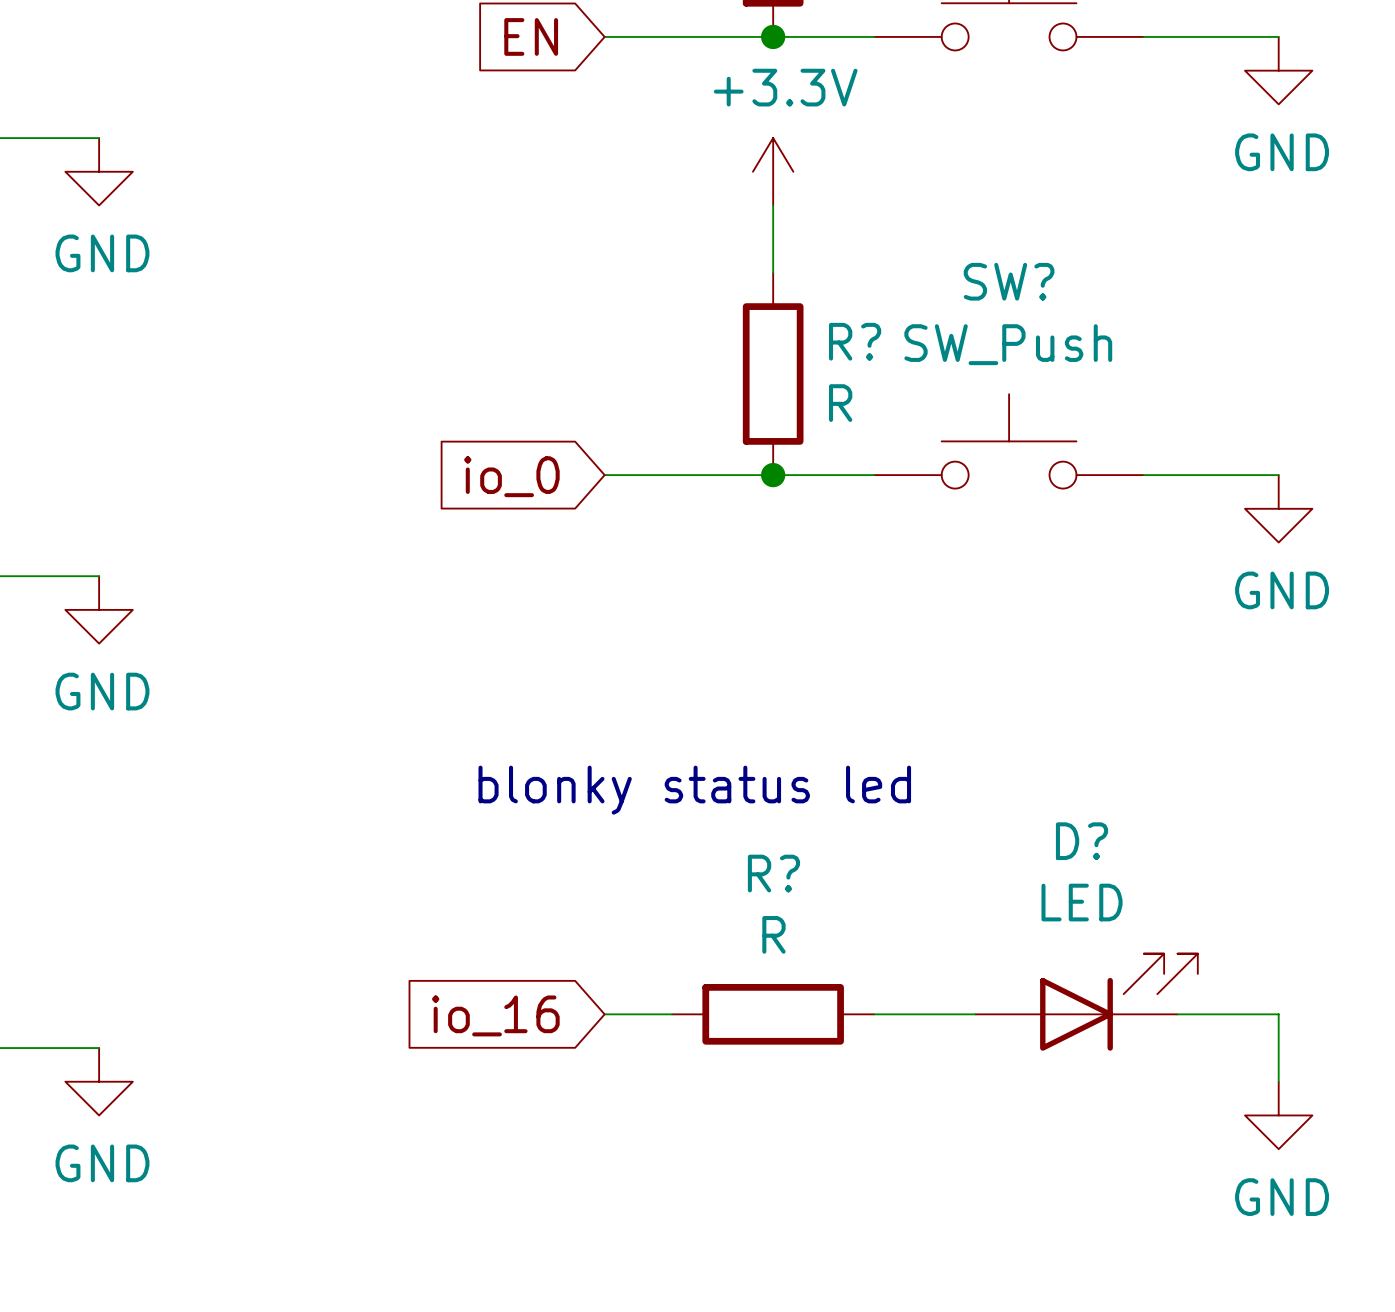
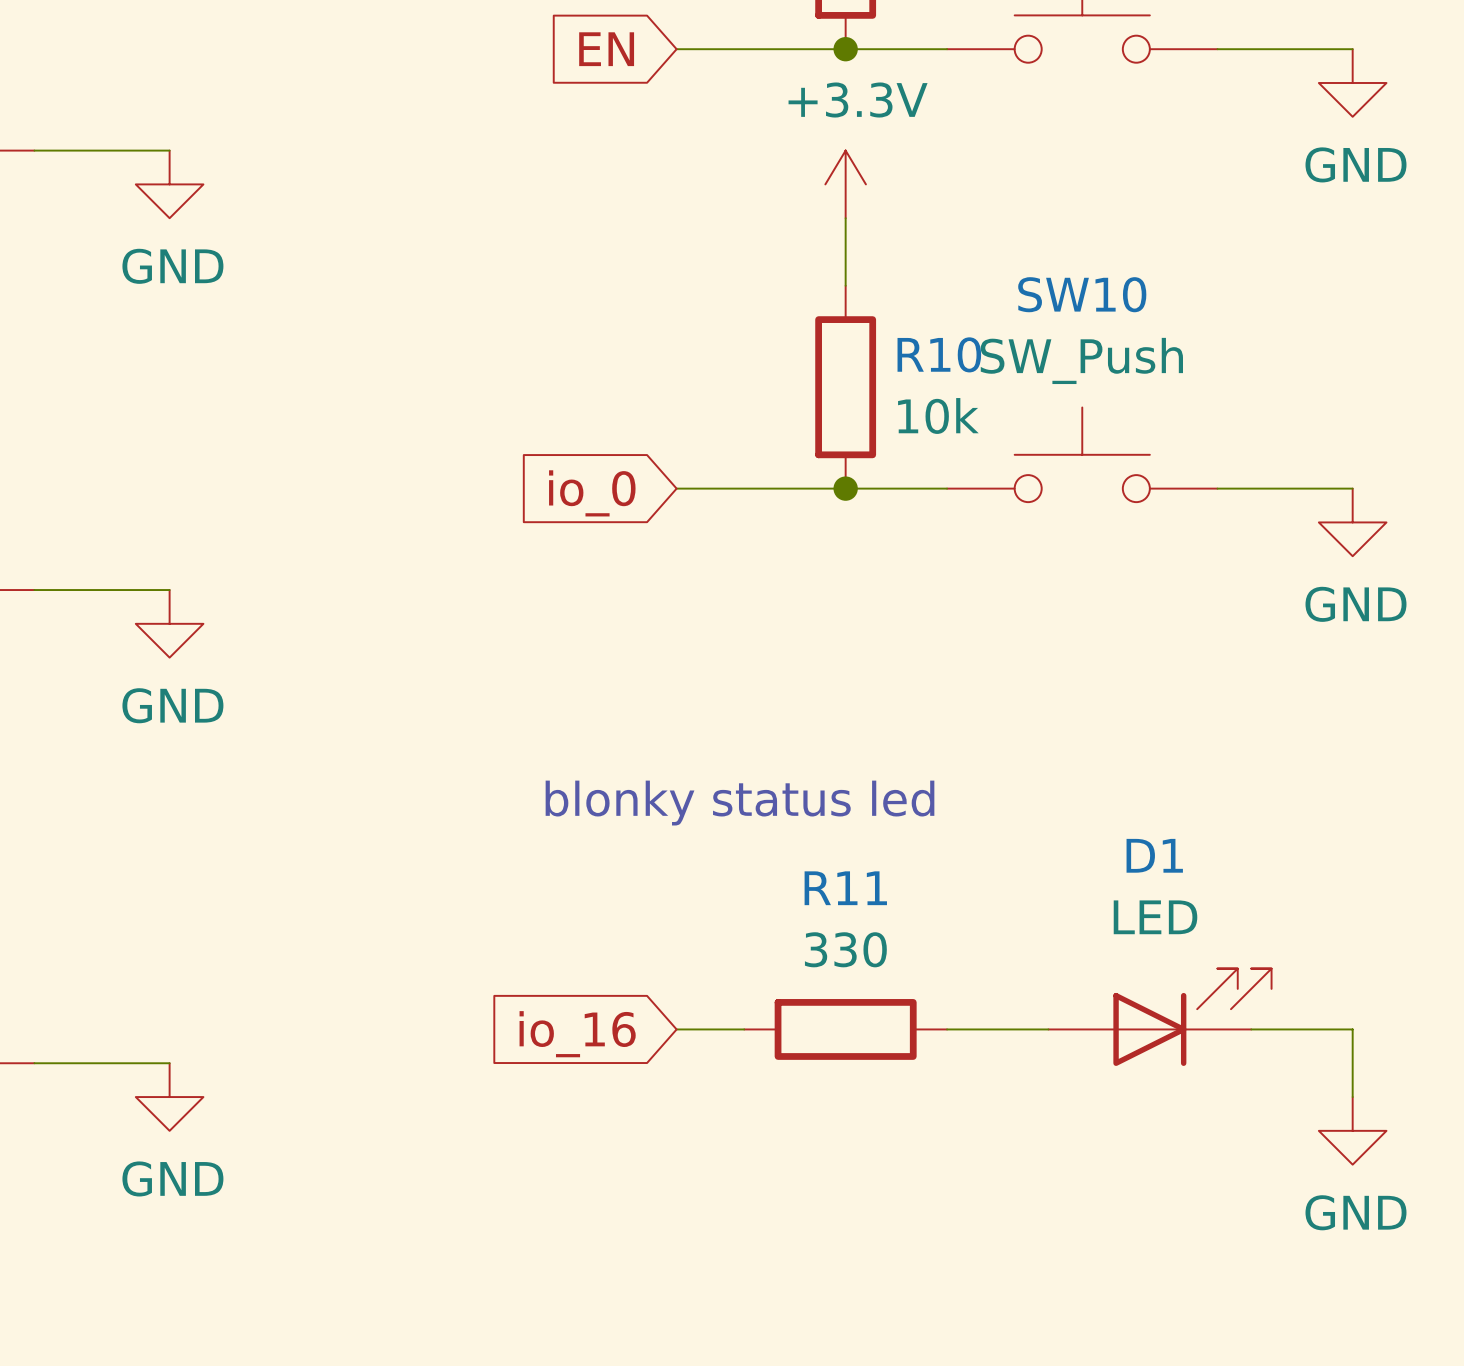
SW? name: SW? (1009, 281) -> SW10 (1082, 294)
R? name: R? (855, 341) -> R10 (939, 354)
R? value: R (840, 403) -> 10k (938, 415)
D? name: D? (1082, 841) -> D1 (1154, 855)
R? name: R? (773, 873) -> R11 (845, 888)
R? value: R (773, 934) -> 330 (845, 949)

